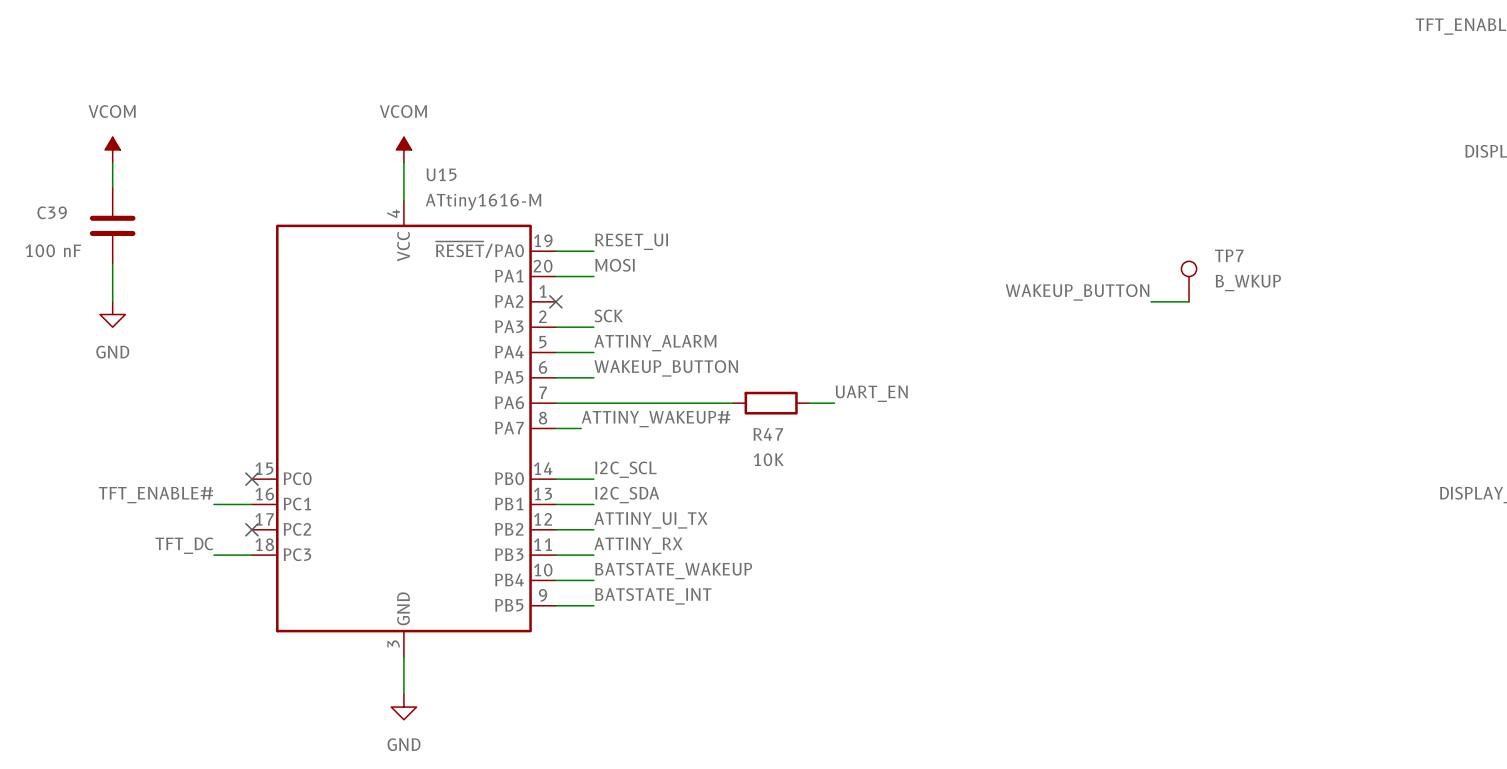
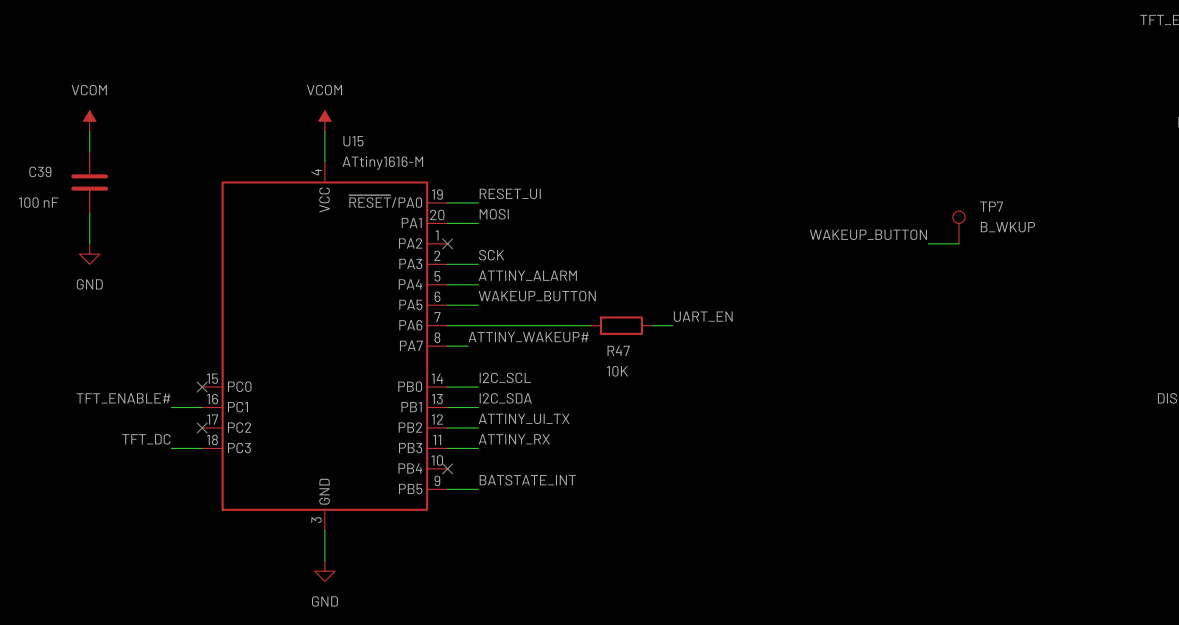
label: BATSTATE_WAKEUP (673, 571) -> none
wire: (555, 580) (593, 580) -> none
no-connect mark: none -> (447, 468)

